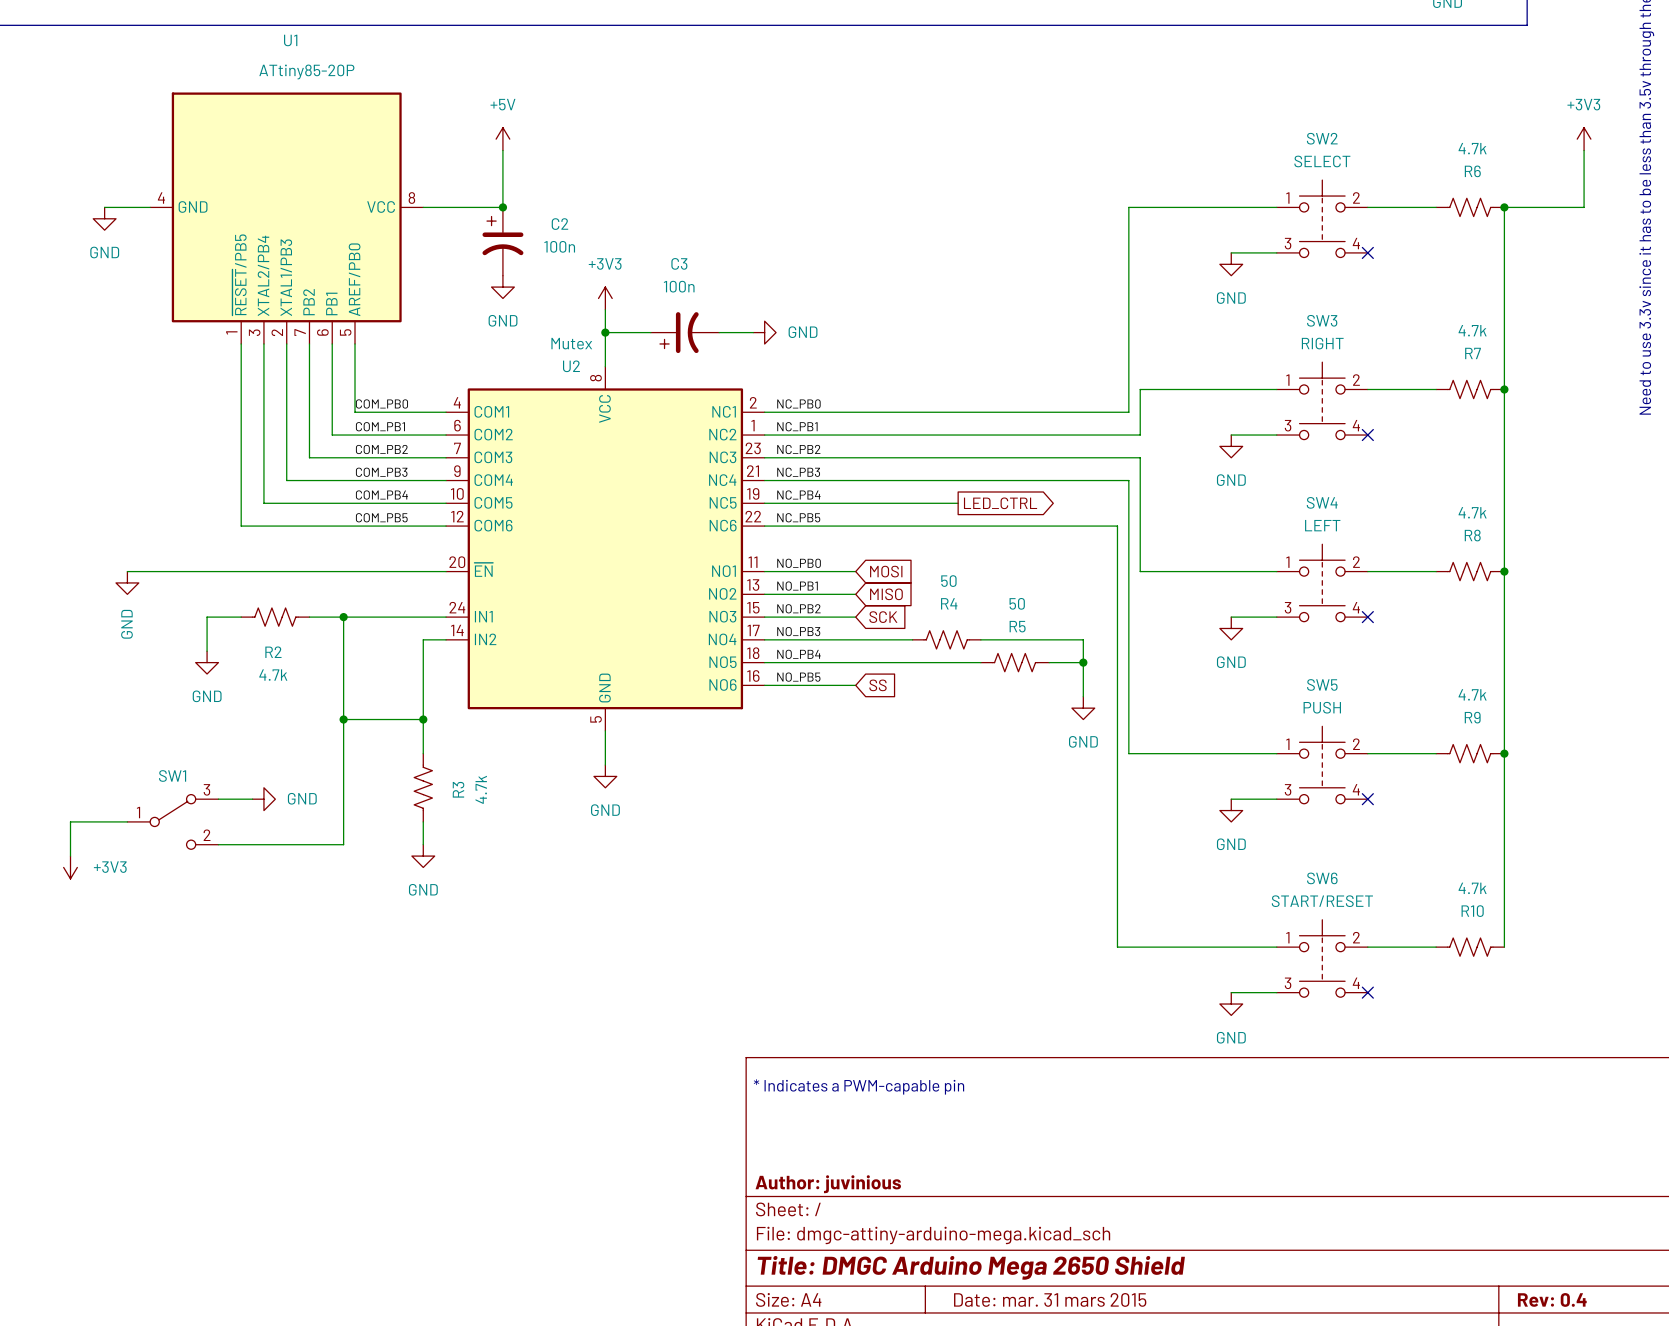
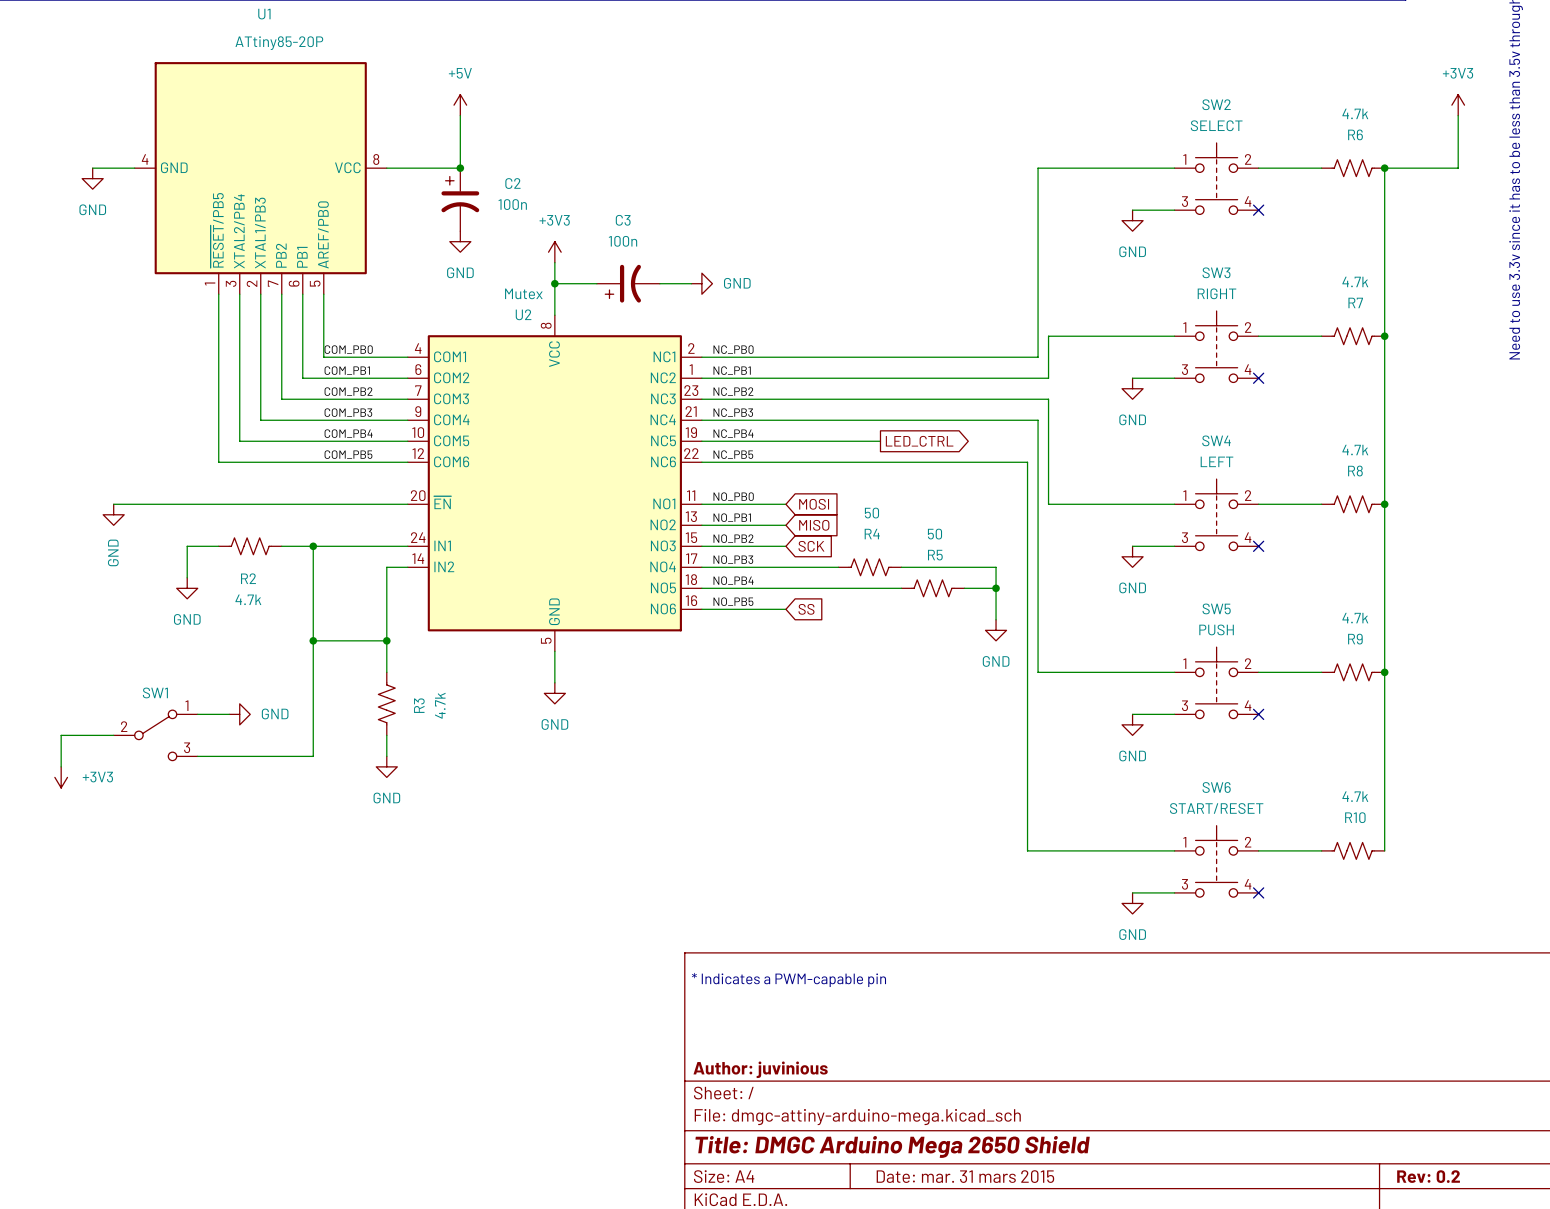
SW1 pin number: 3 (206, 789) -> 1 (186, 705)
SW1 pin number: 1 (138, 812) -> 2 (124, 726)
SW1 pin number: 2 (207, 835) -> 3 (187, 747)
title block: Rev: 0.4 (1552, 1299) -> Rev: 0.2 (1428, 1176)

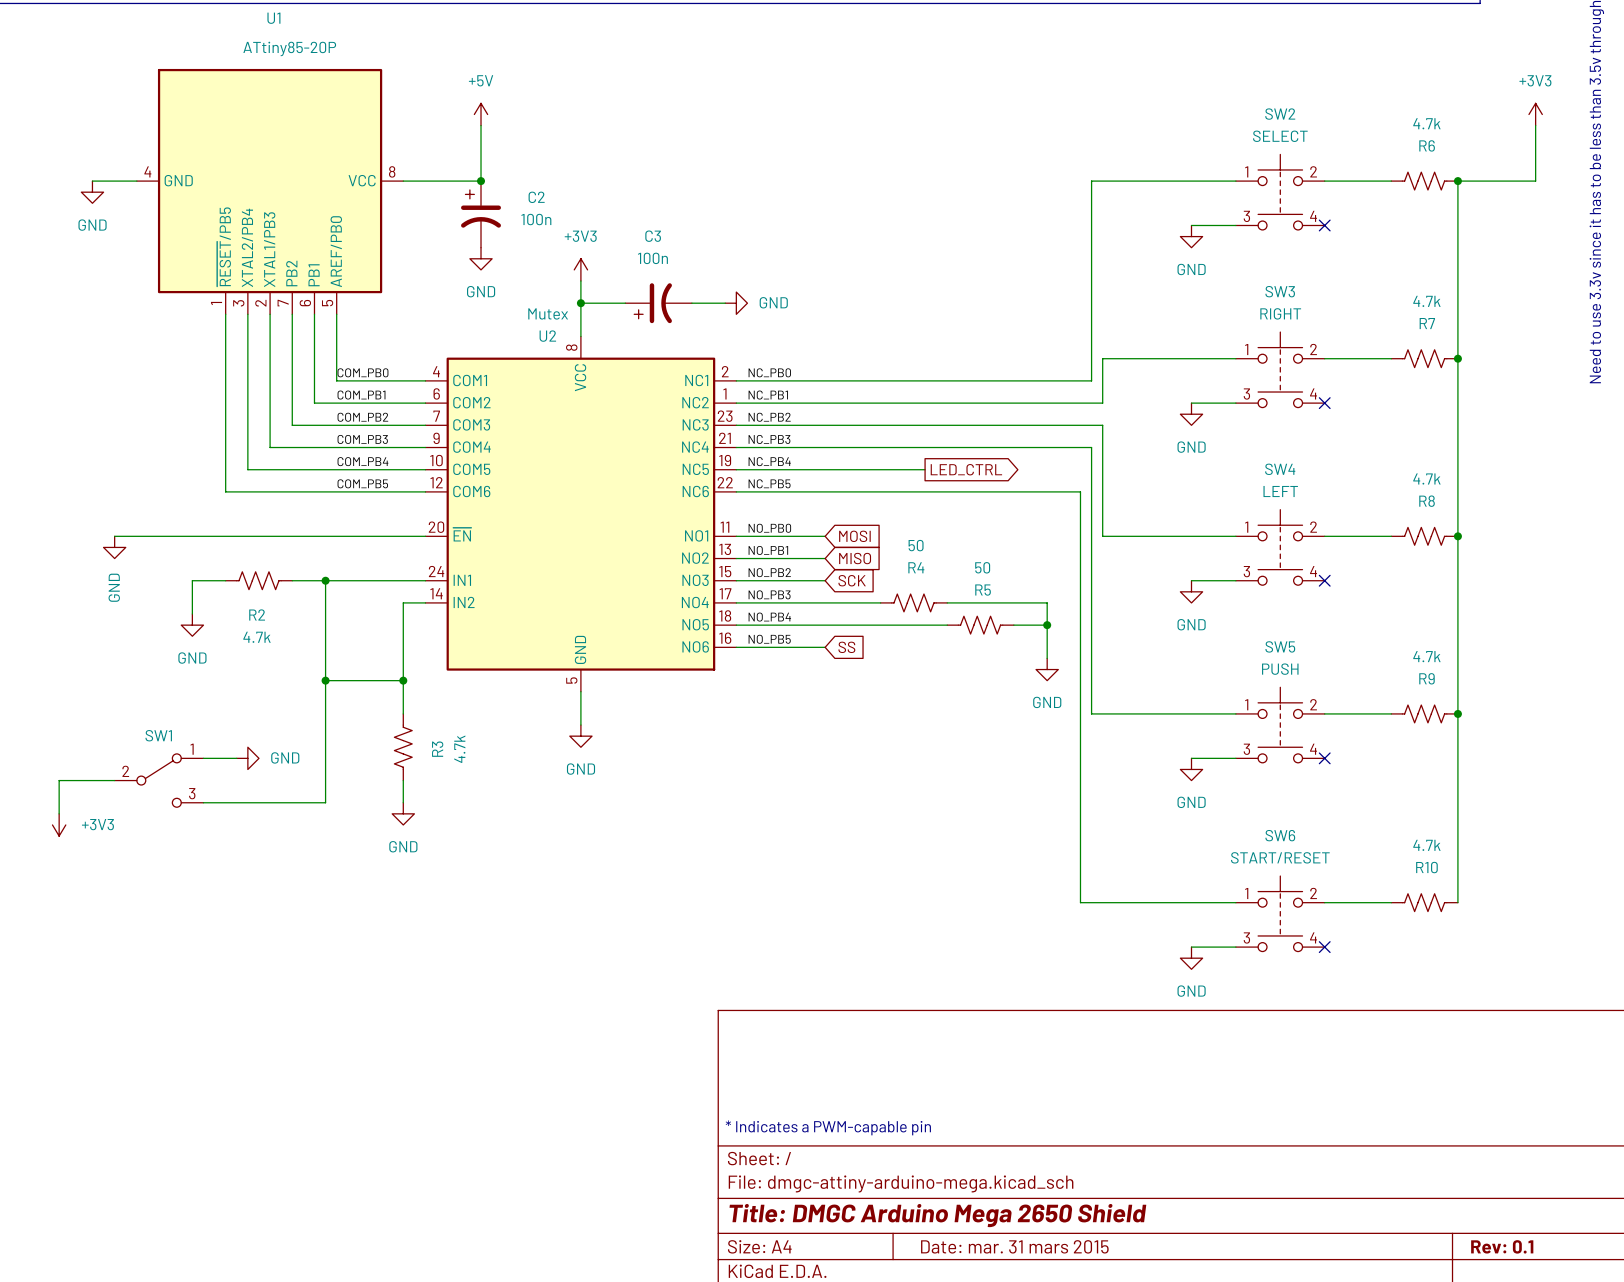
text position: * Indicates a PWM-capable pin (788, 979) -> * Indicates a PWM-capable pin (828, 1127)
title block: Author: juvinious (760, 1069) -> none
title block: Rev: 0.2 (1428, 1176) -> Rev: 0.1 (1502, 1246)

